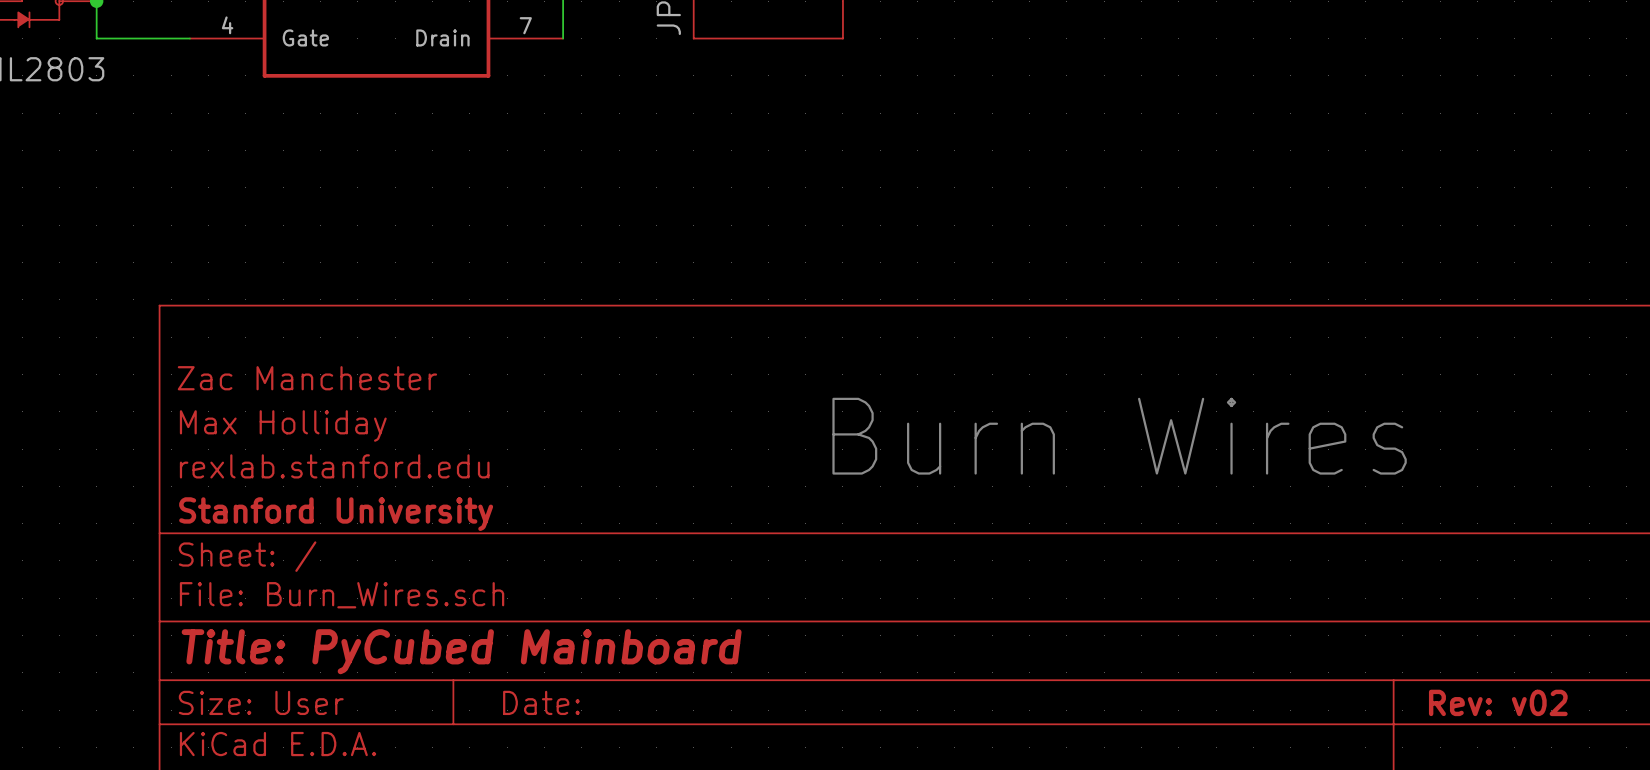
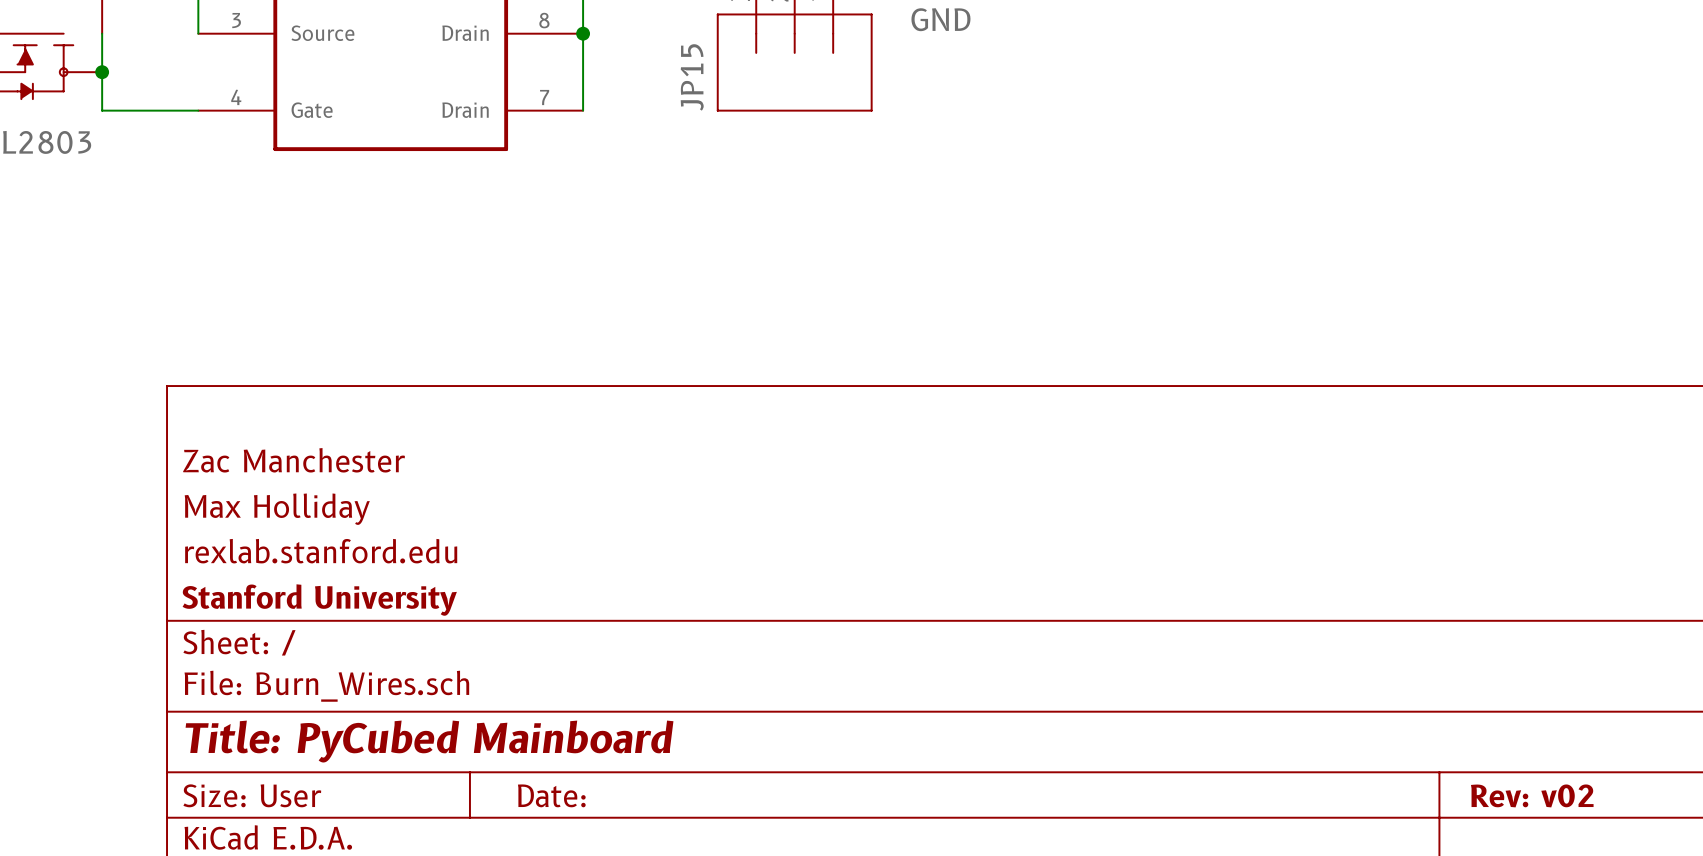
text: Burn Wires (1119, 436) -> none

